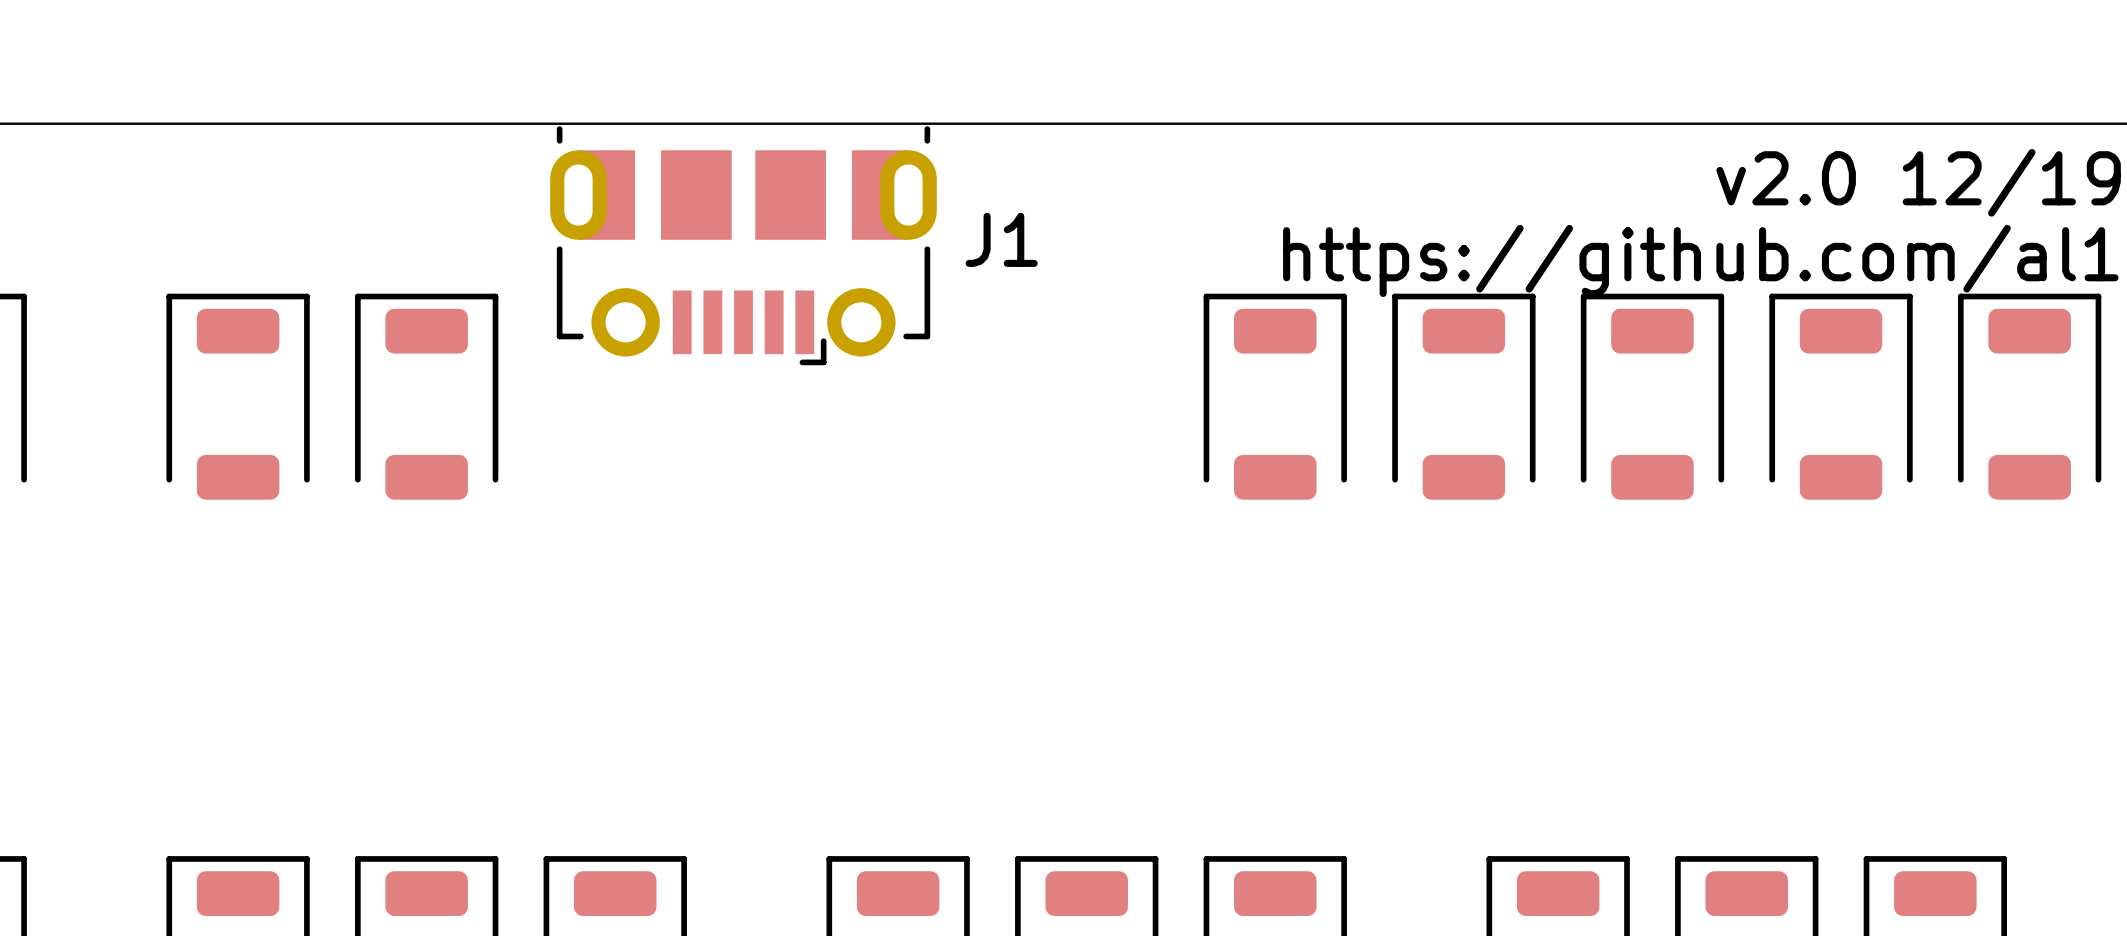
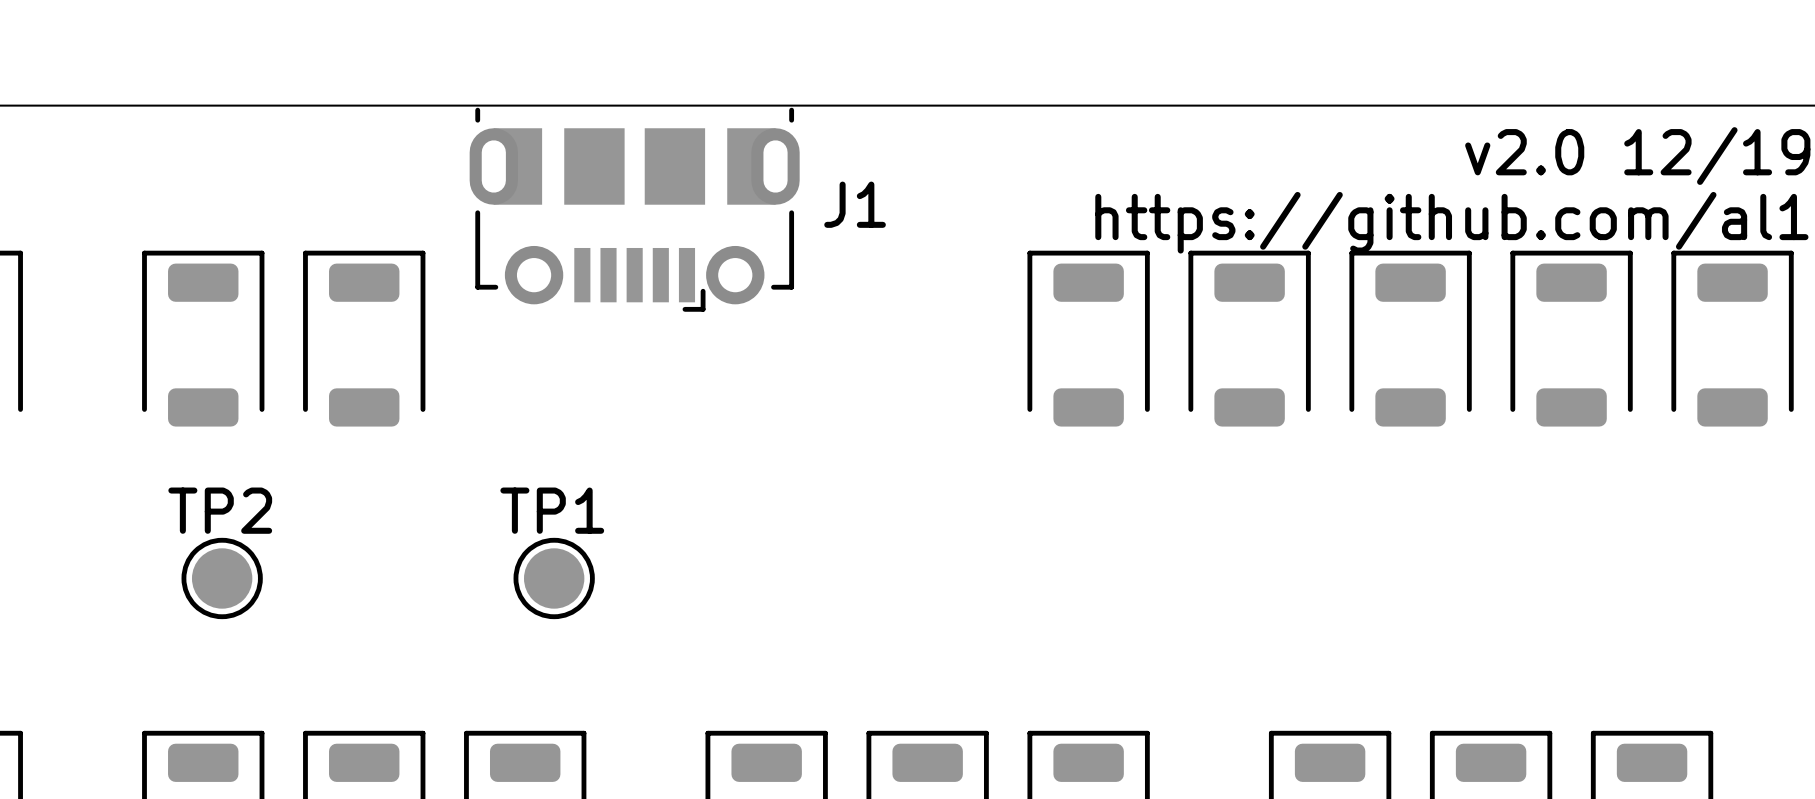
TP2: none -> (222, 578)
TP1: none -> (554, 578)

